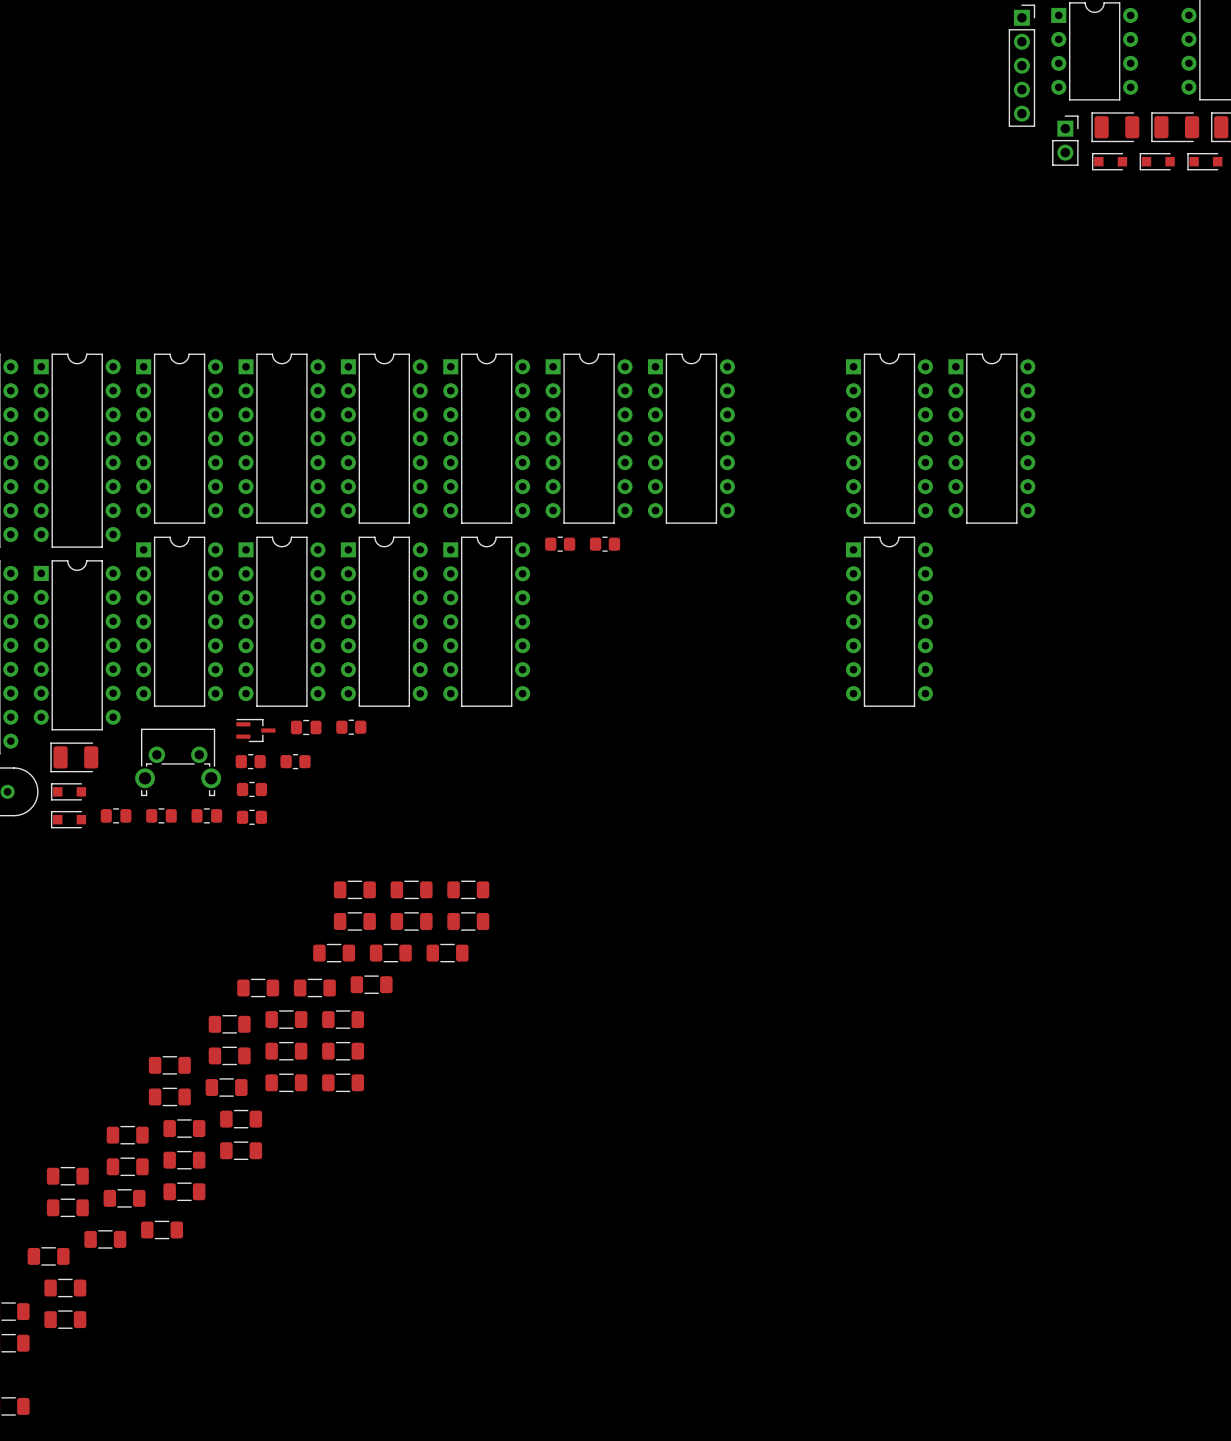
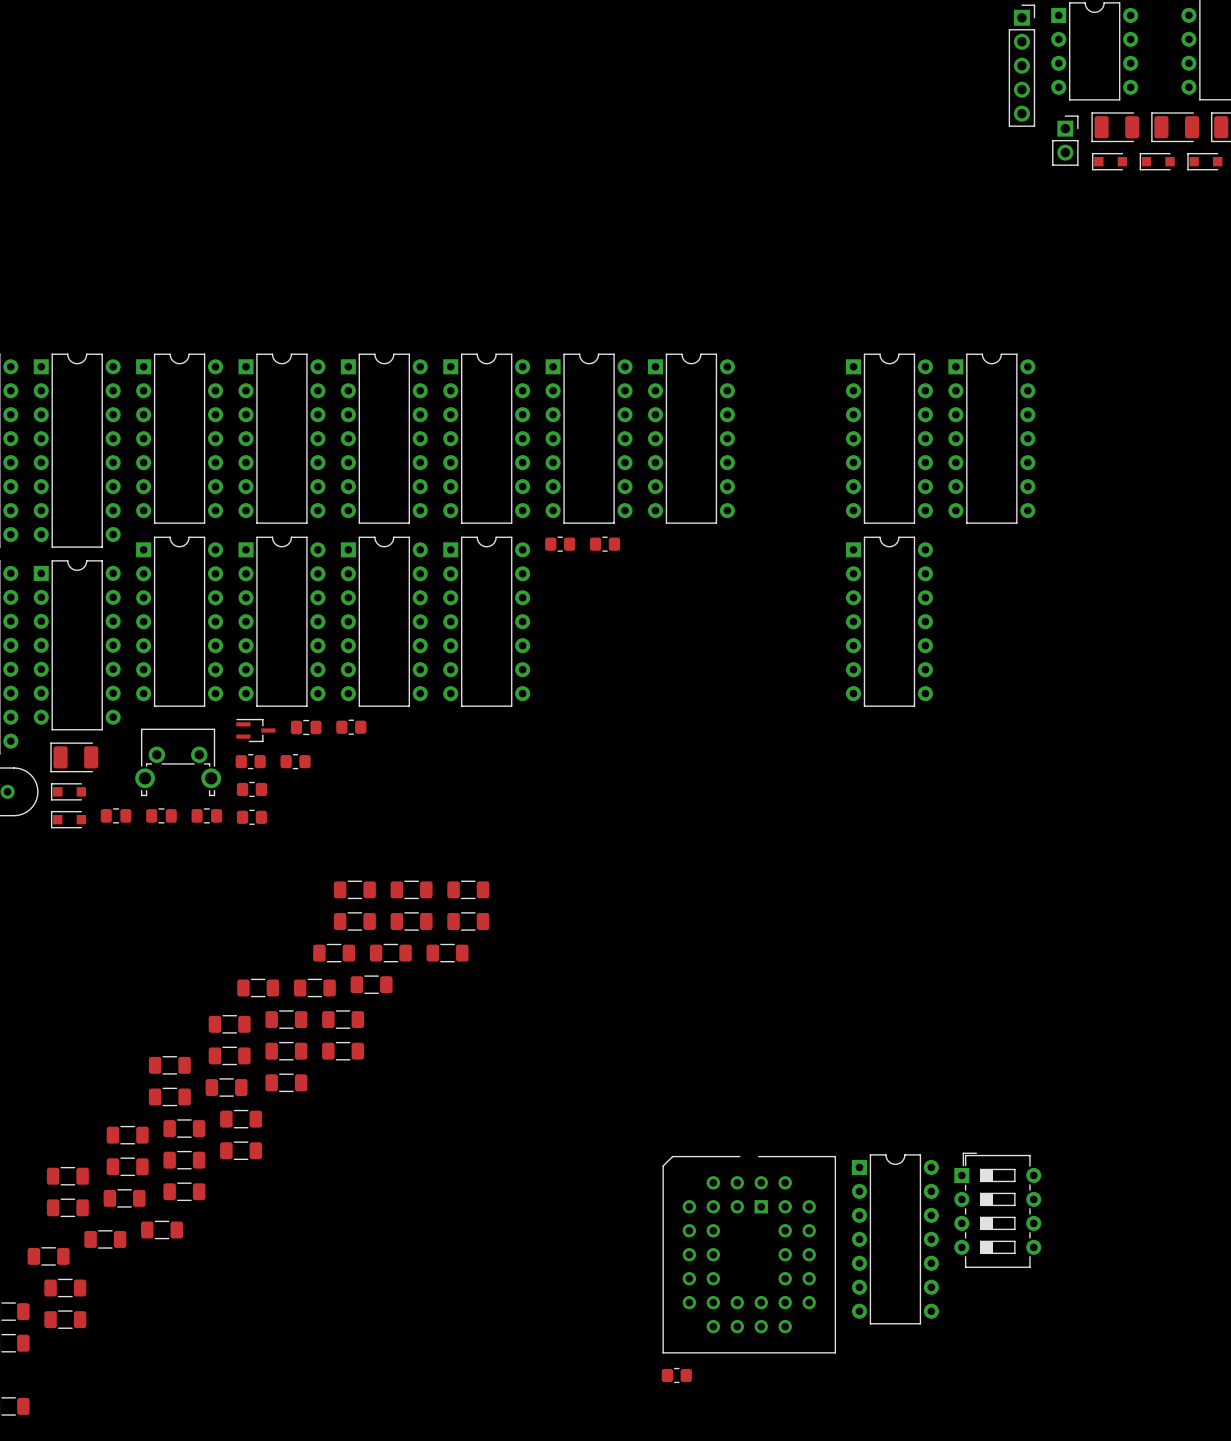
part: (343, 1082) -> none
part: none -> (997, 1210)
part: none -> (895, 1239)
part: none -> (749, 1254)
part: none -> (676, 1375)

